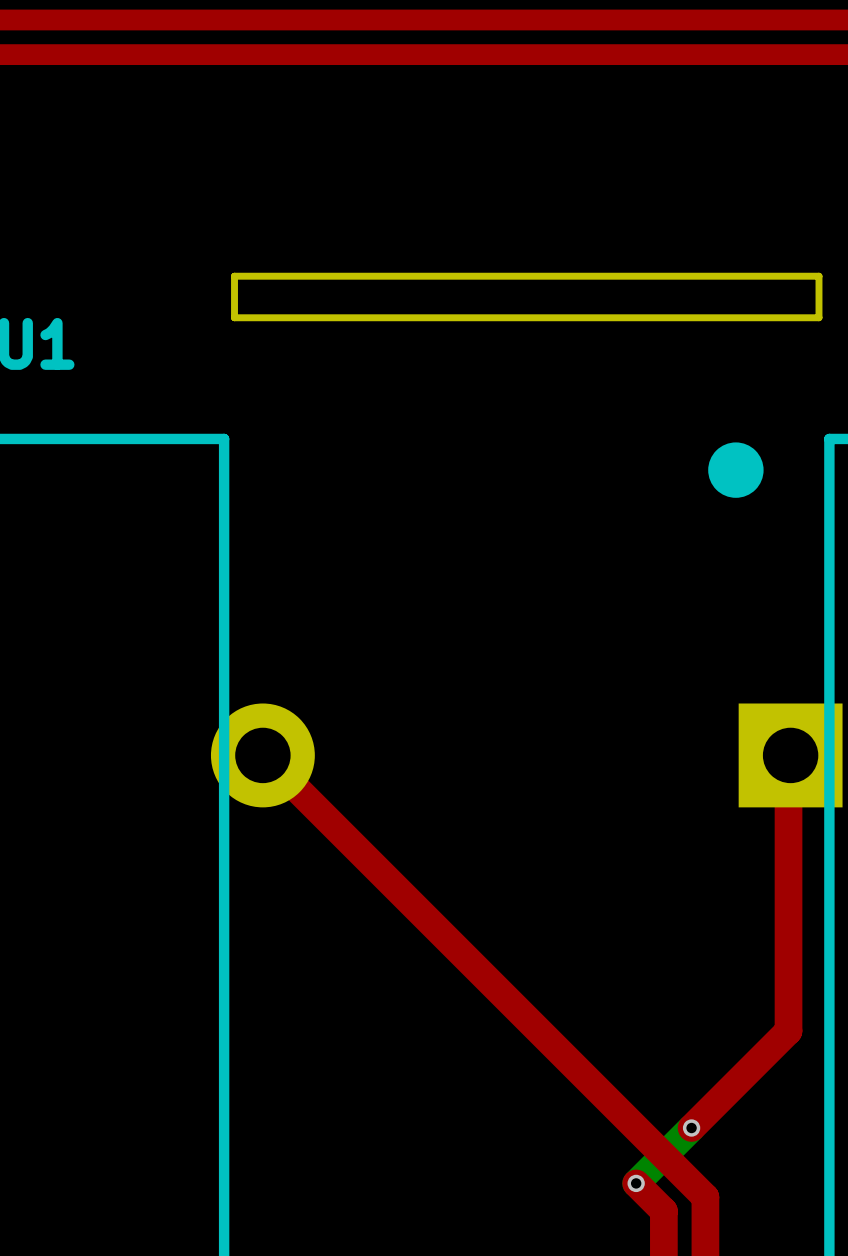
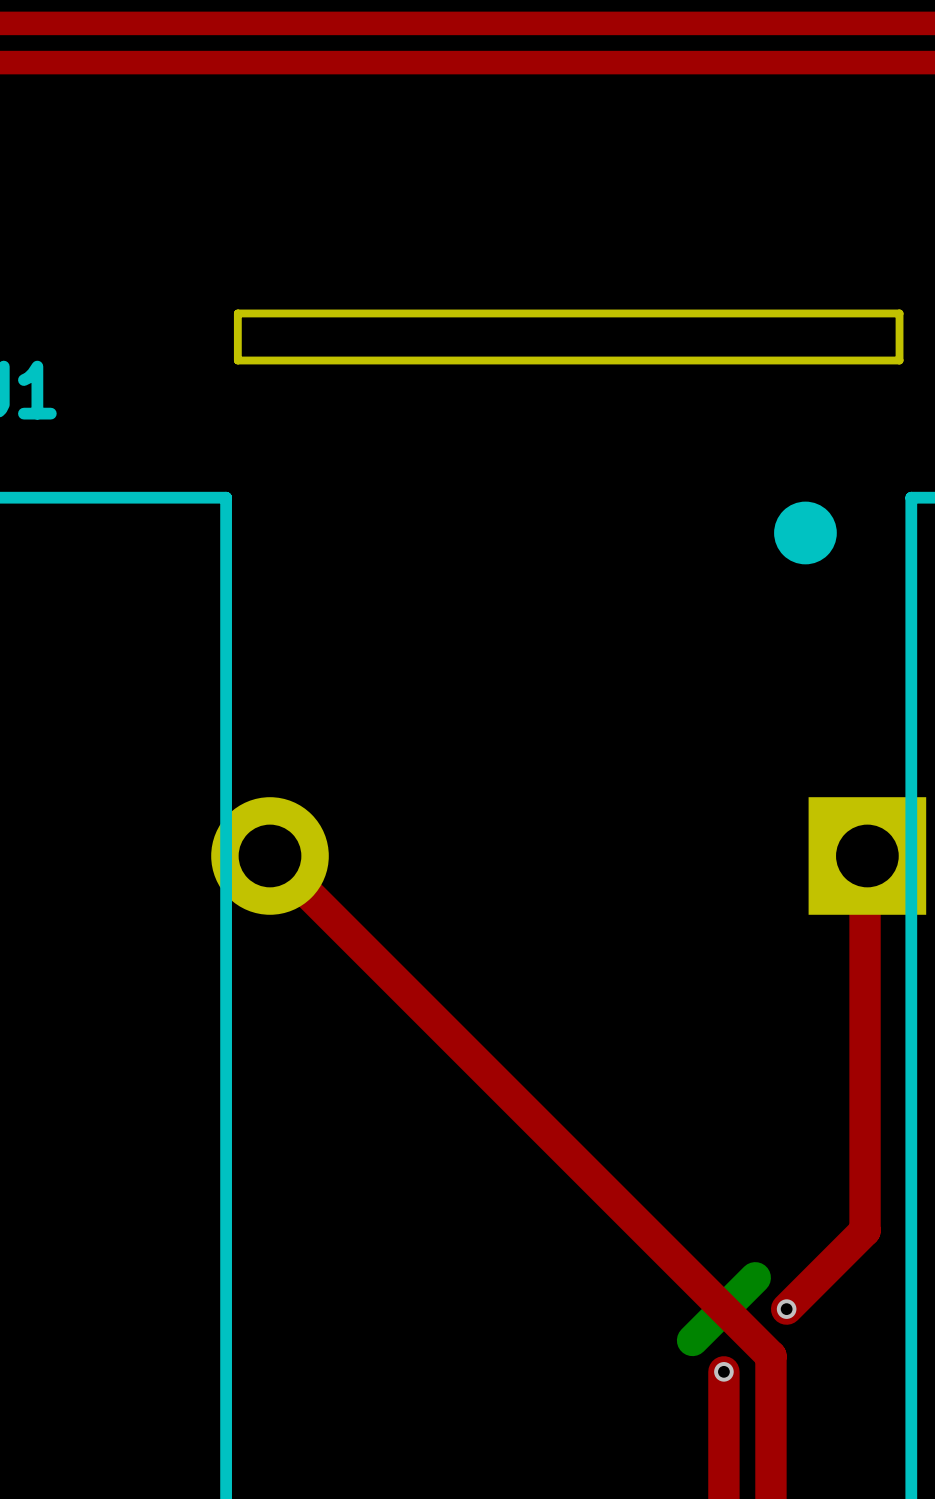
top track: (788, 1031) (691, 1128) -> (865, 1168) (865, 1230) (786, 1309)
via position: (691, 1128) -> (786, 1309)
top track: (636, 1183) (663, 1211) -> none
via position: (636, 1183) -> (723, 1371)

